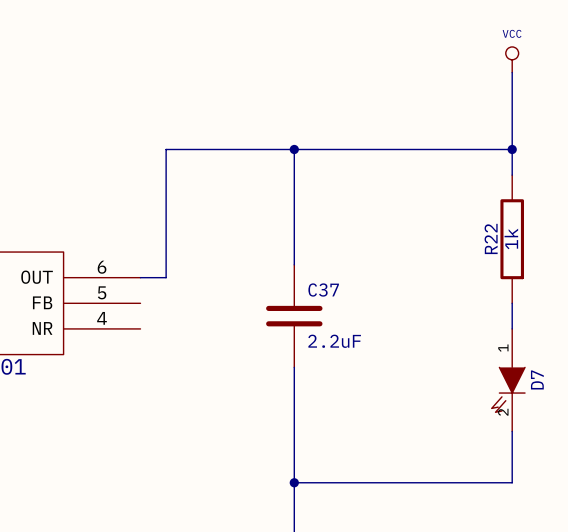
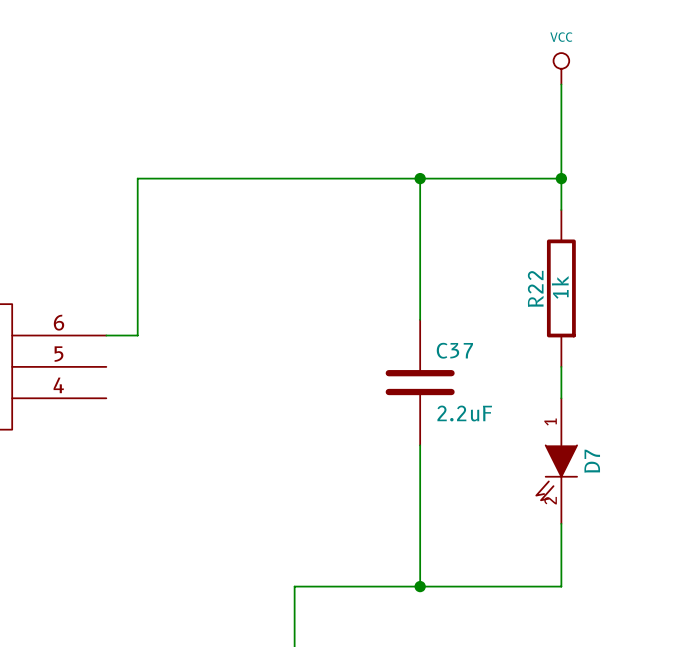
wire: (294, 149) (294, 264) -> (420, 178) (420, 319)
junction: (294, 149) -> none
junction: none -> (420, 178)
C37 position: (294, 316) -> (420, 382)
wire: (294, 367) (294, 482) -> (420, 445) (420, 586)
junction: (294, 482) -> none
junction: none -> (420, 586)

